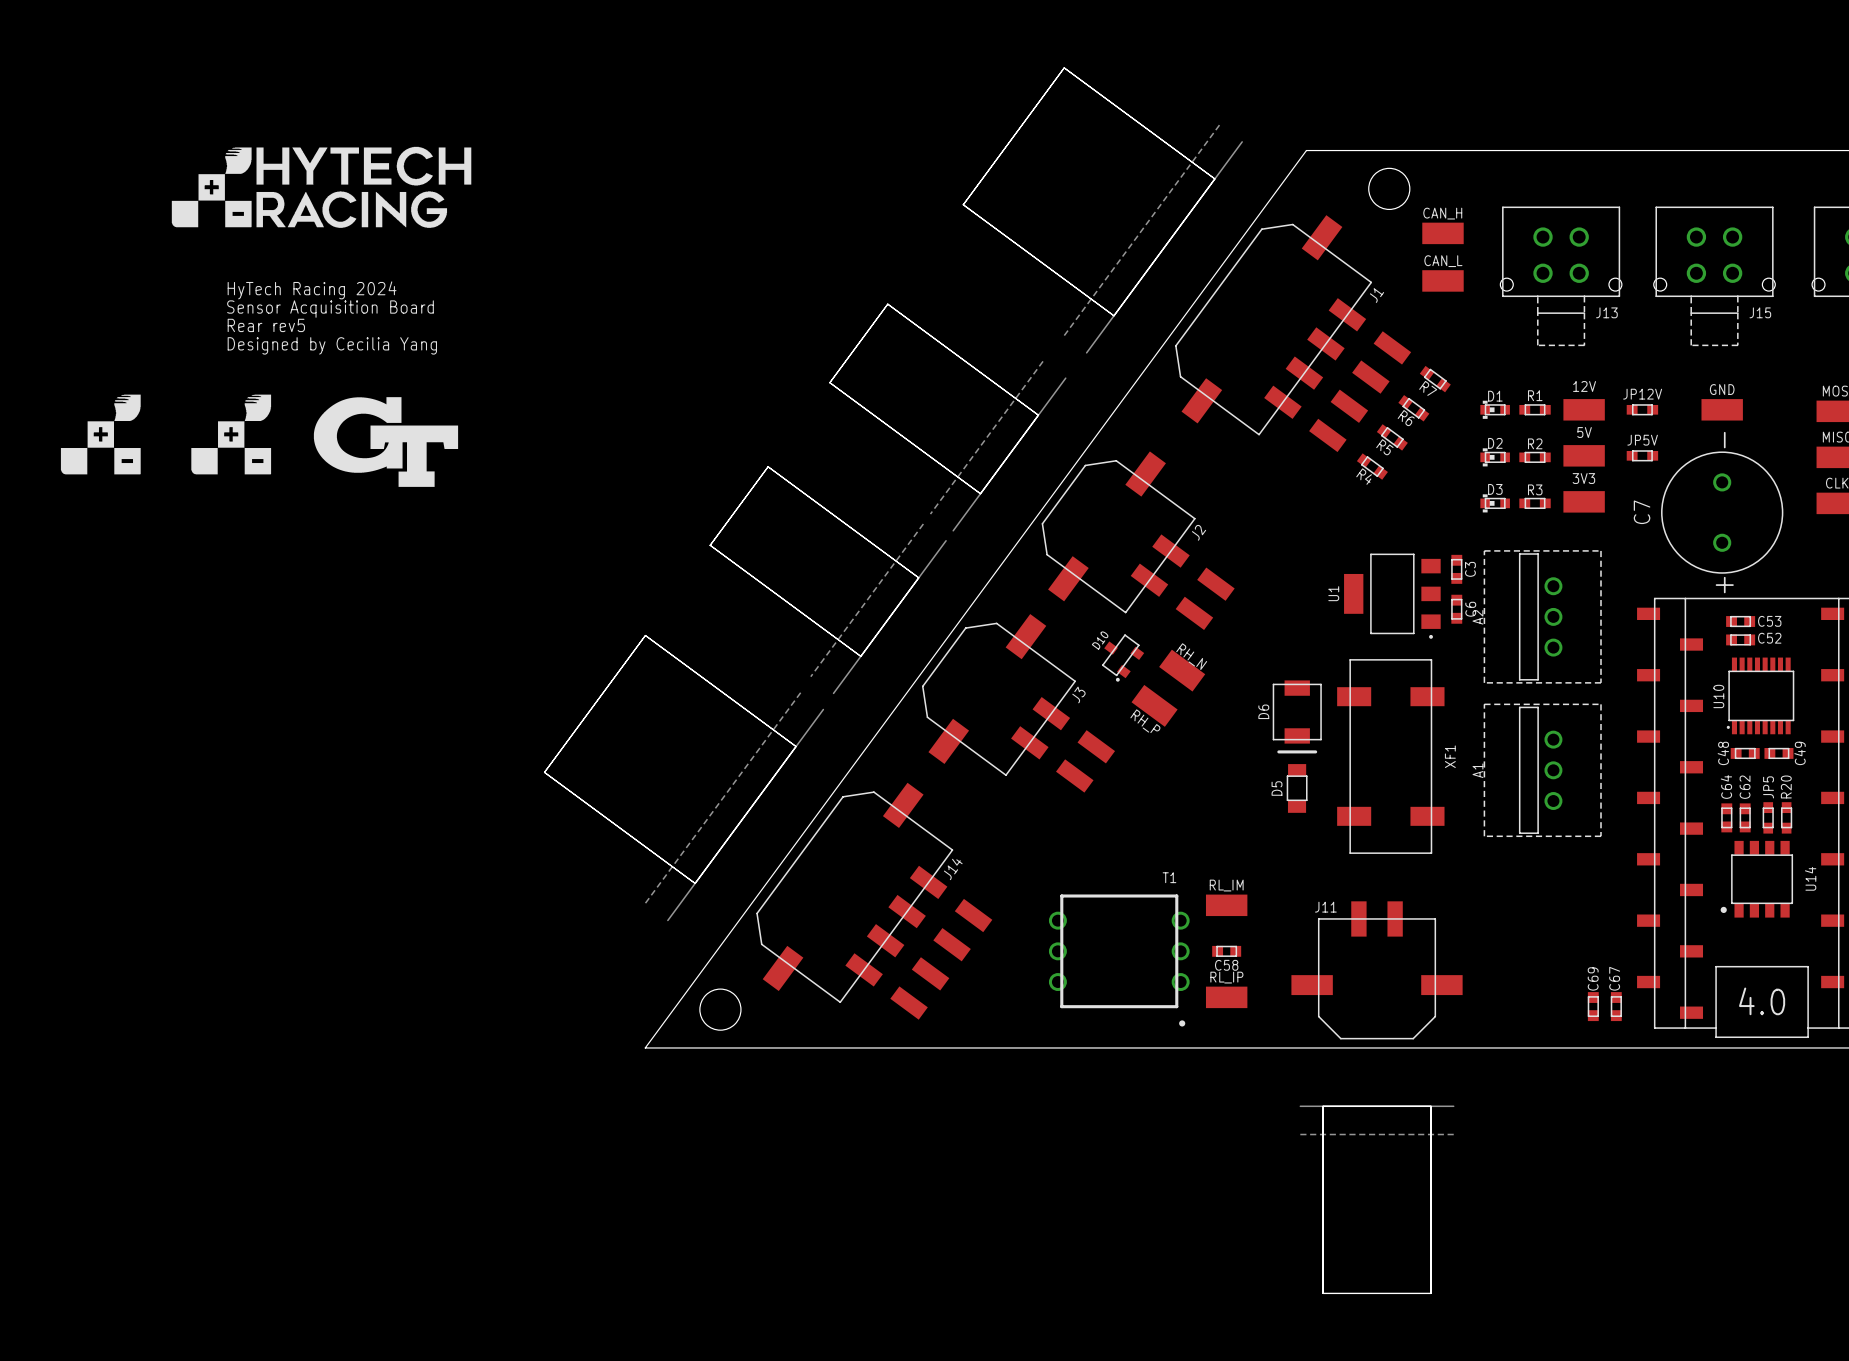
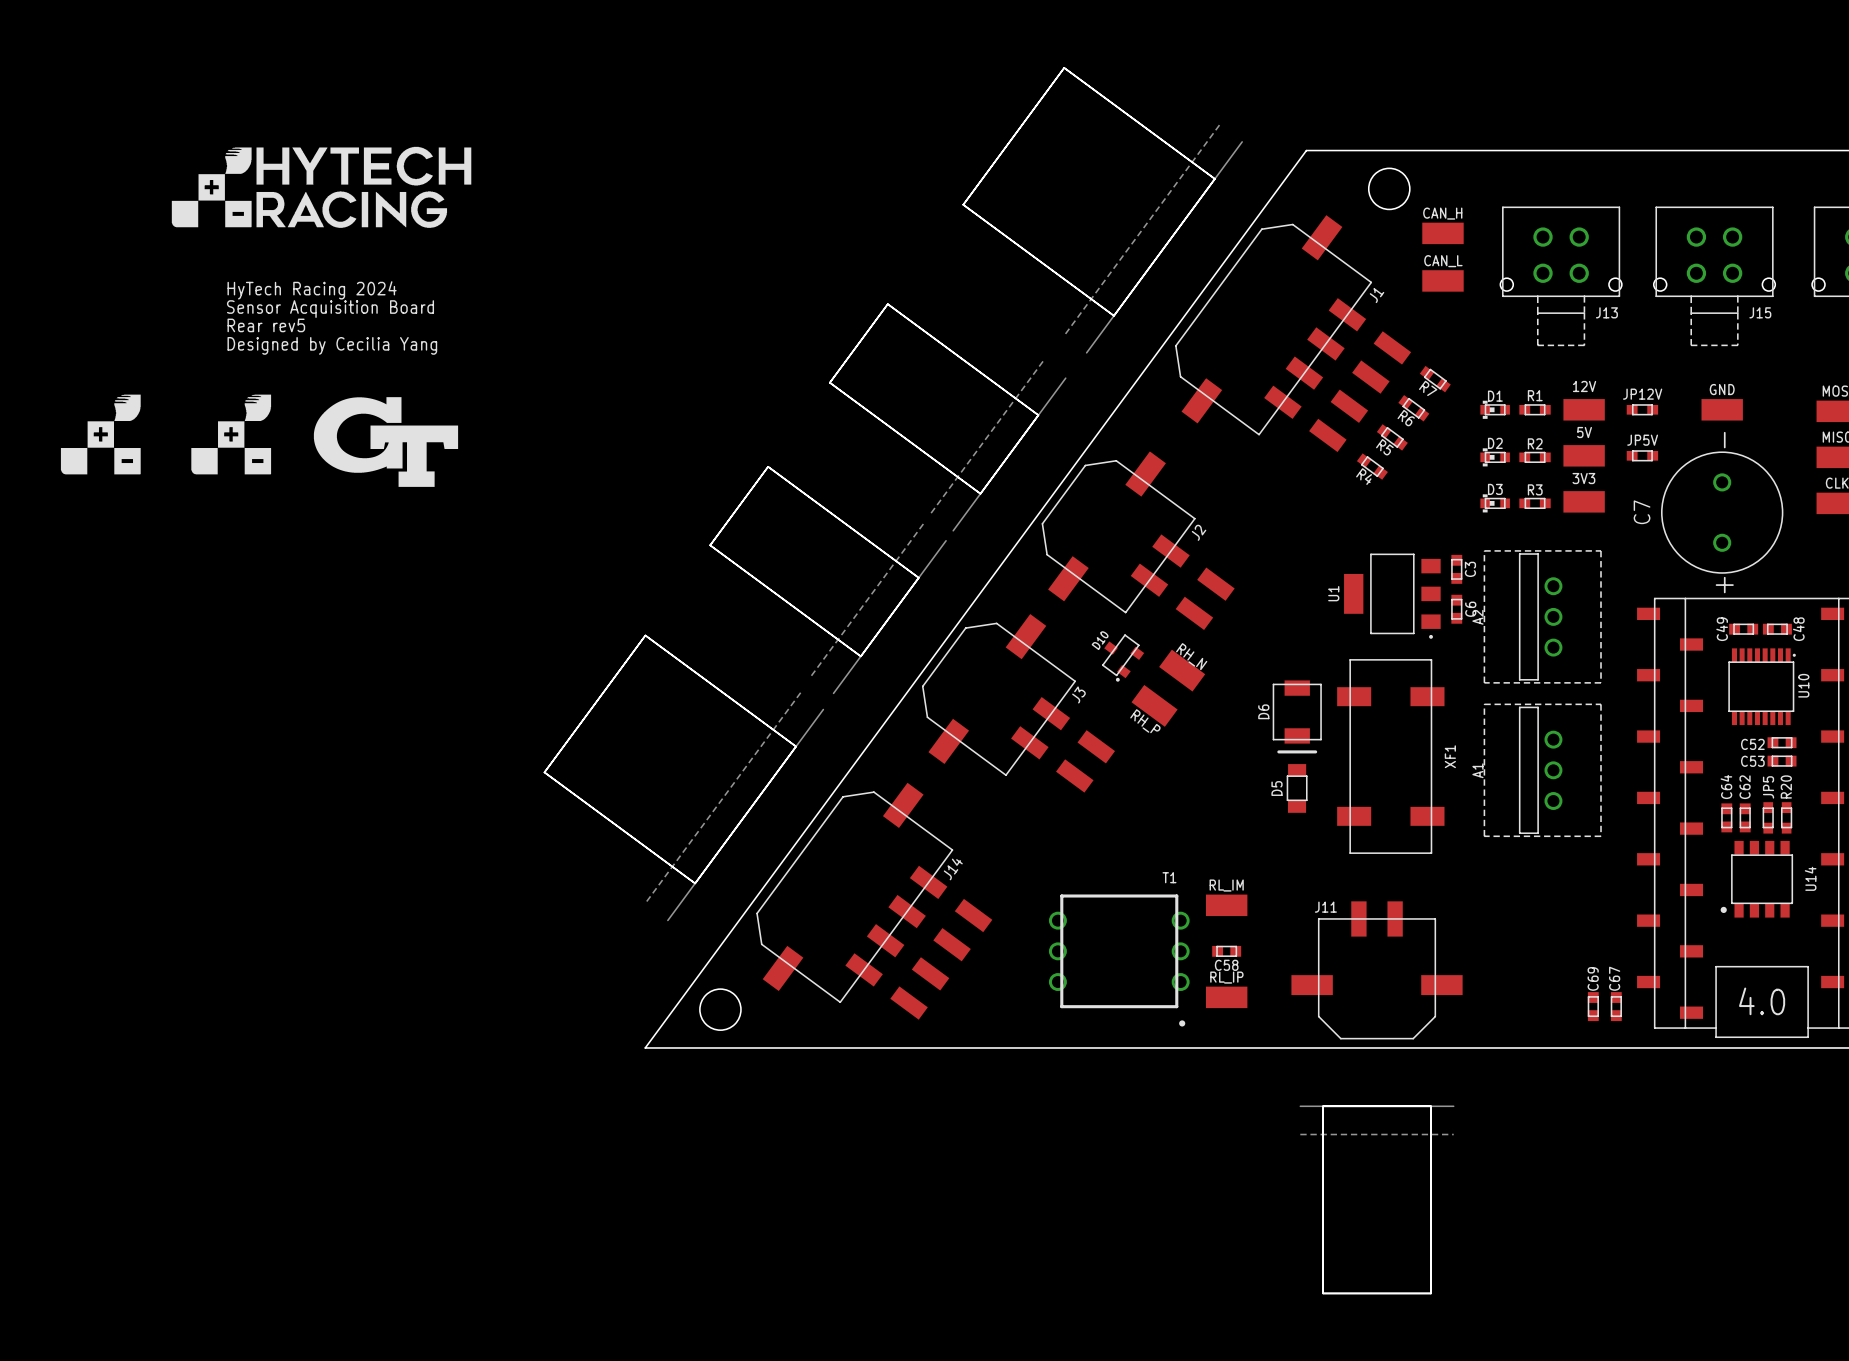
C53 position: (1740, 621) -> (1782, 761)
C53 name position: C53 (1769, 621) -> C53 (1752, 761)
C52 name position: C52 (1769, 638) -> C52 (1752, 744)
C52 position: (1740, 639) -> (1782, 742)
U10 rotation: 0° (1760, 695) -> 180° (1762, 686)
C48 name position: C48 (1723, 753) -> C48 (1798, 629)
C48 position: (1745, 753) -> (1777, 629)
C49 position: (1778, 753) -> (1743, 629)
C49 name position: C49 (1800, 753) -> C49 (1722, 629)

